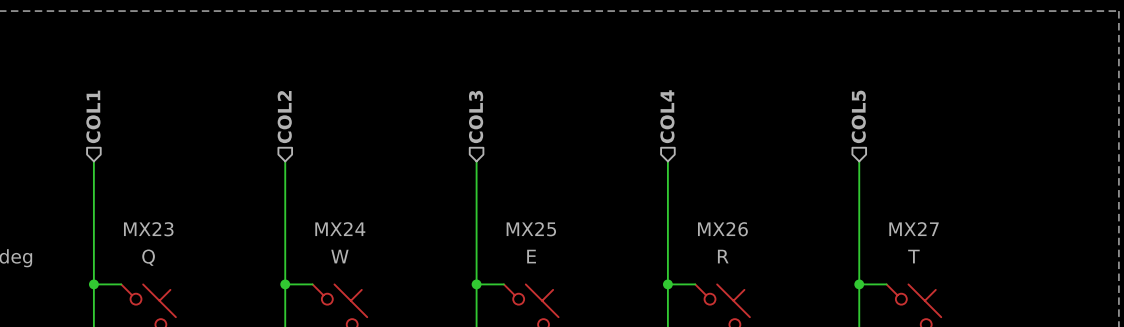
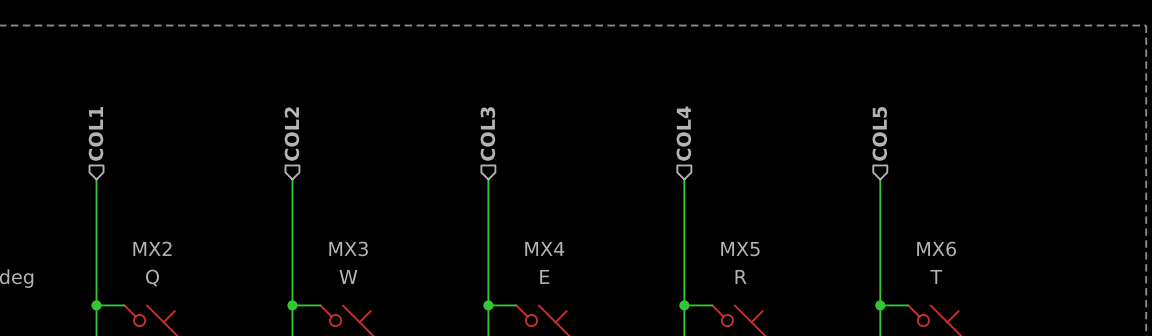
MX23 name: MX23 (148, 229) -> MX2 (152, 248)
MX24 name: MX24 (340, 229) -> MX3 (348, 248)
MX25 name: MX25 (531, 229) -> MX4 (544, 248)
MX26 name: MX26 (722, 229) -> MX5 (740, 249)
MX27 name: MX27 (914, 229) -> MX6 (936, 248)

